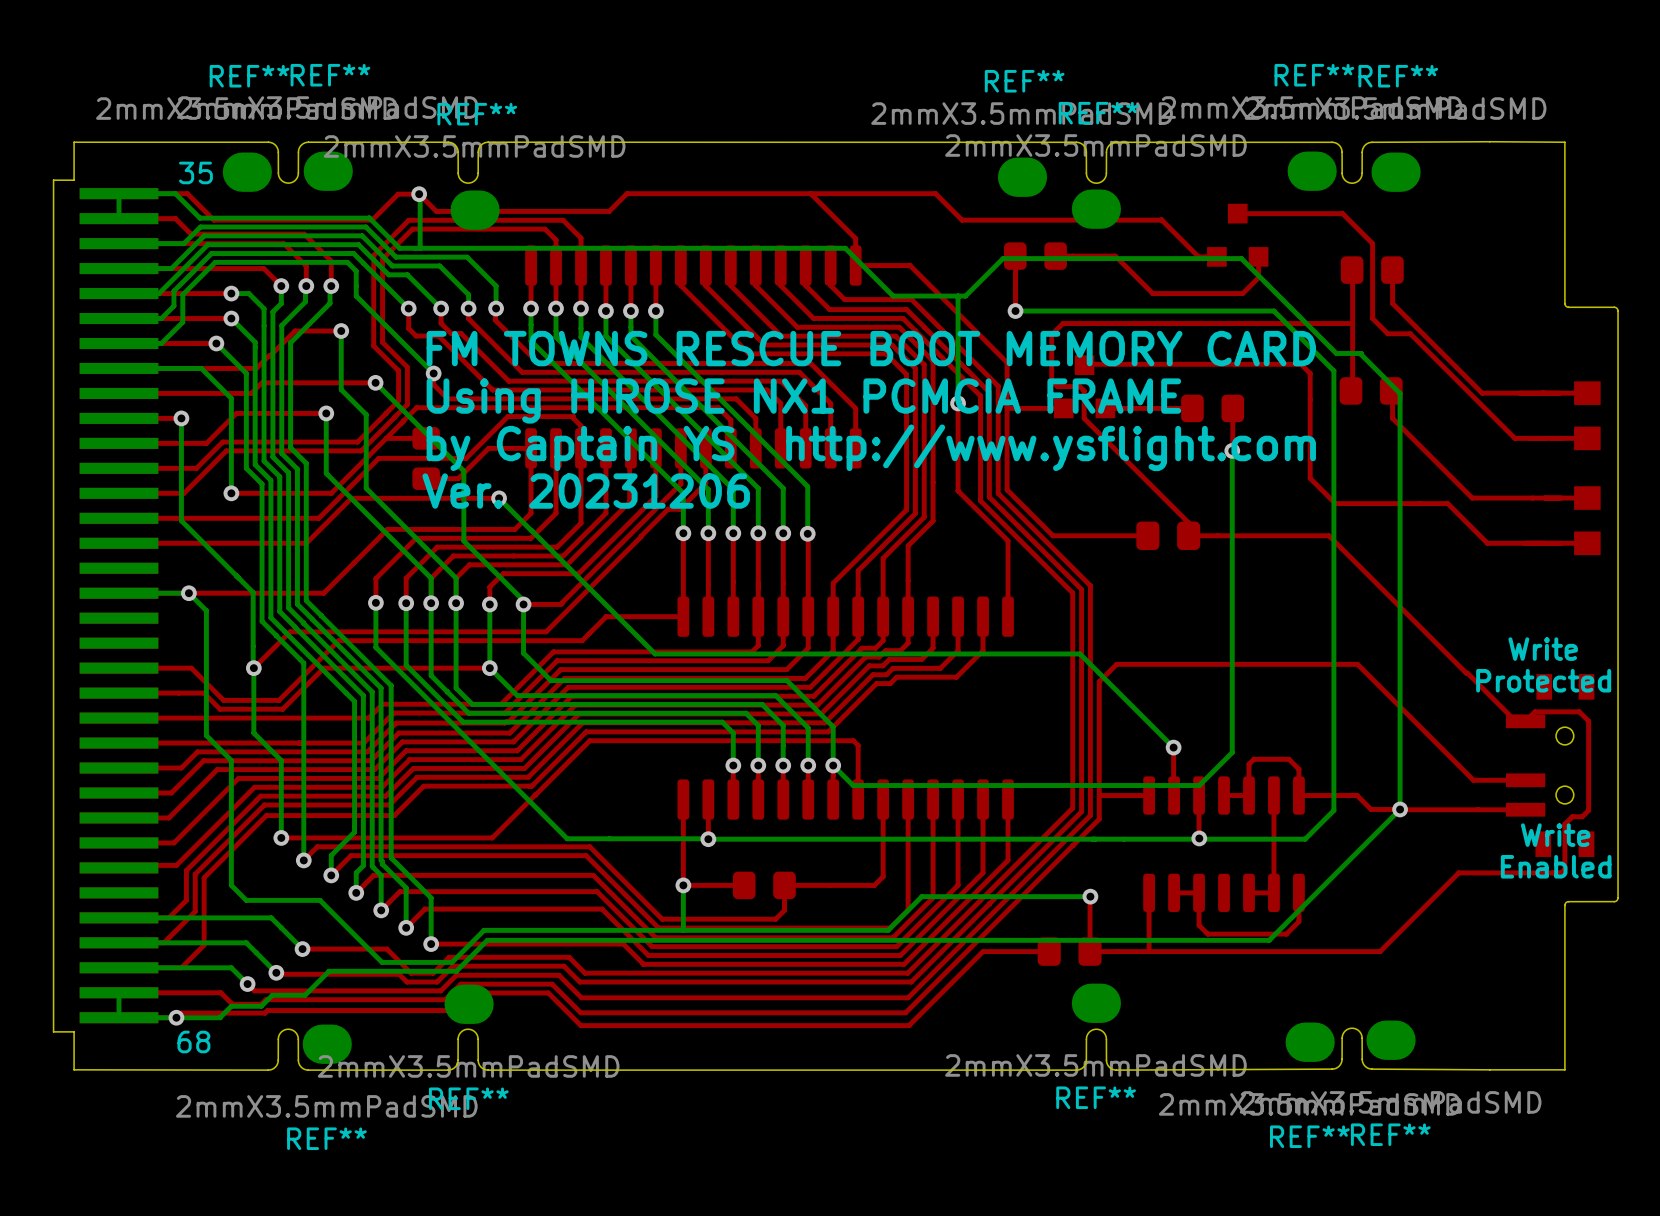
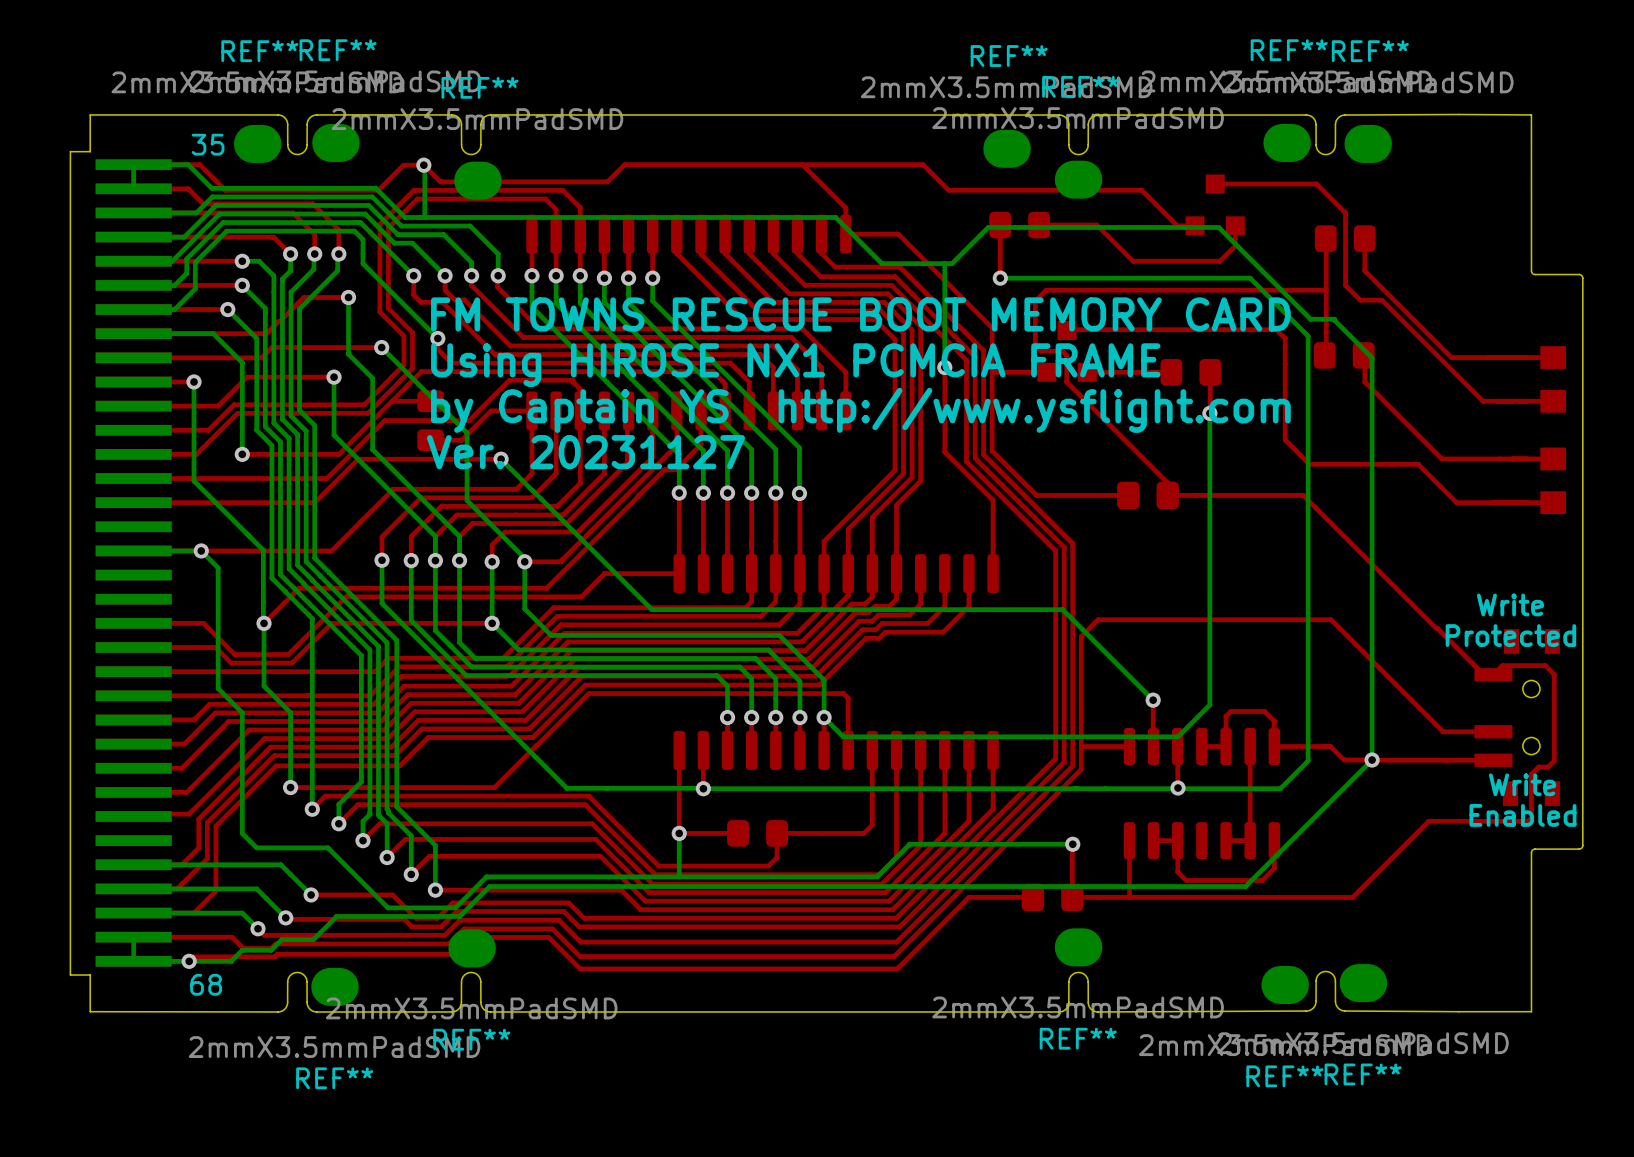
text: Ver. 20231206 (586, 491) -> Ver. 20231127 (585, 452)

